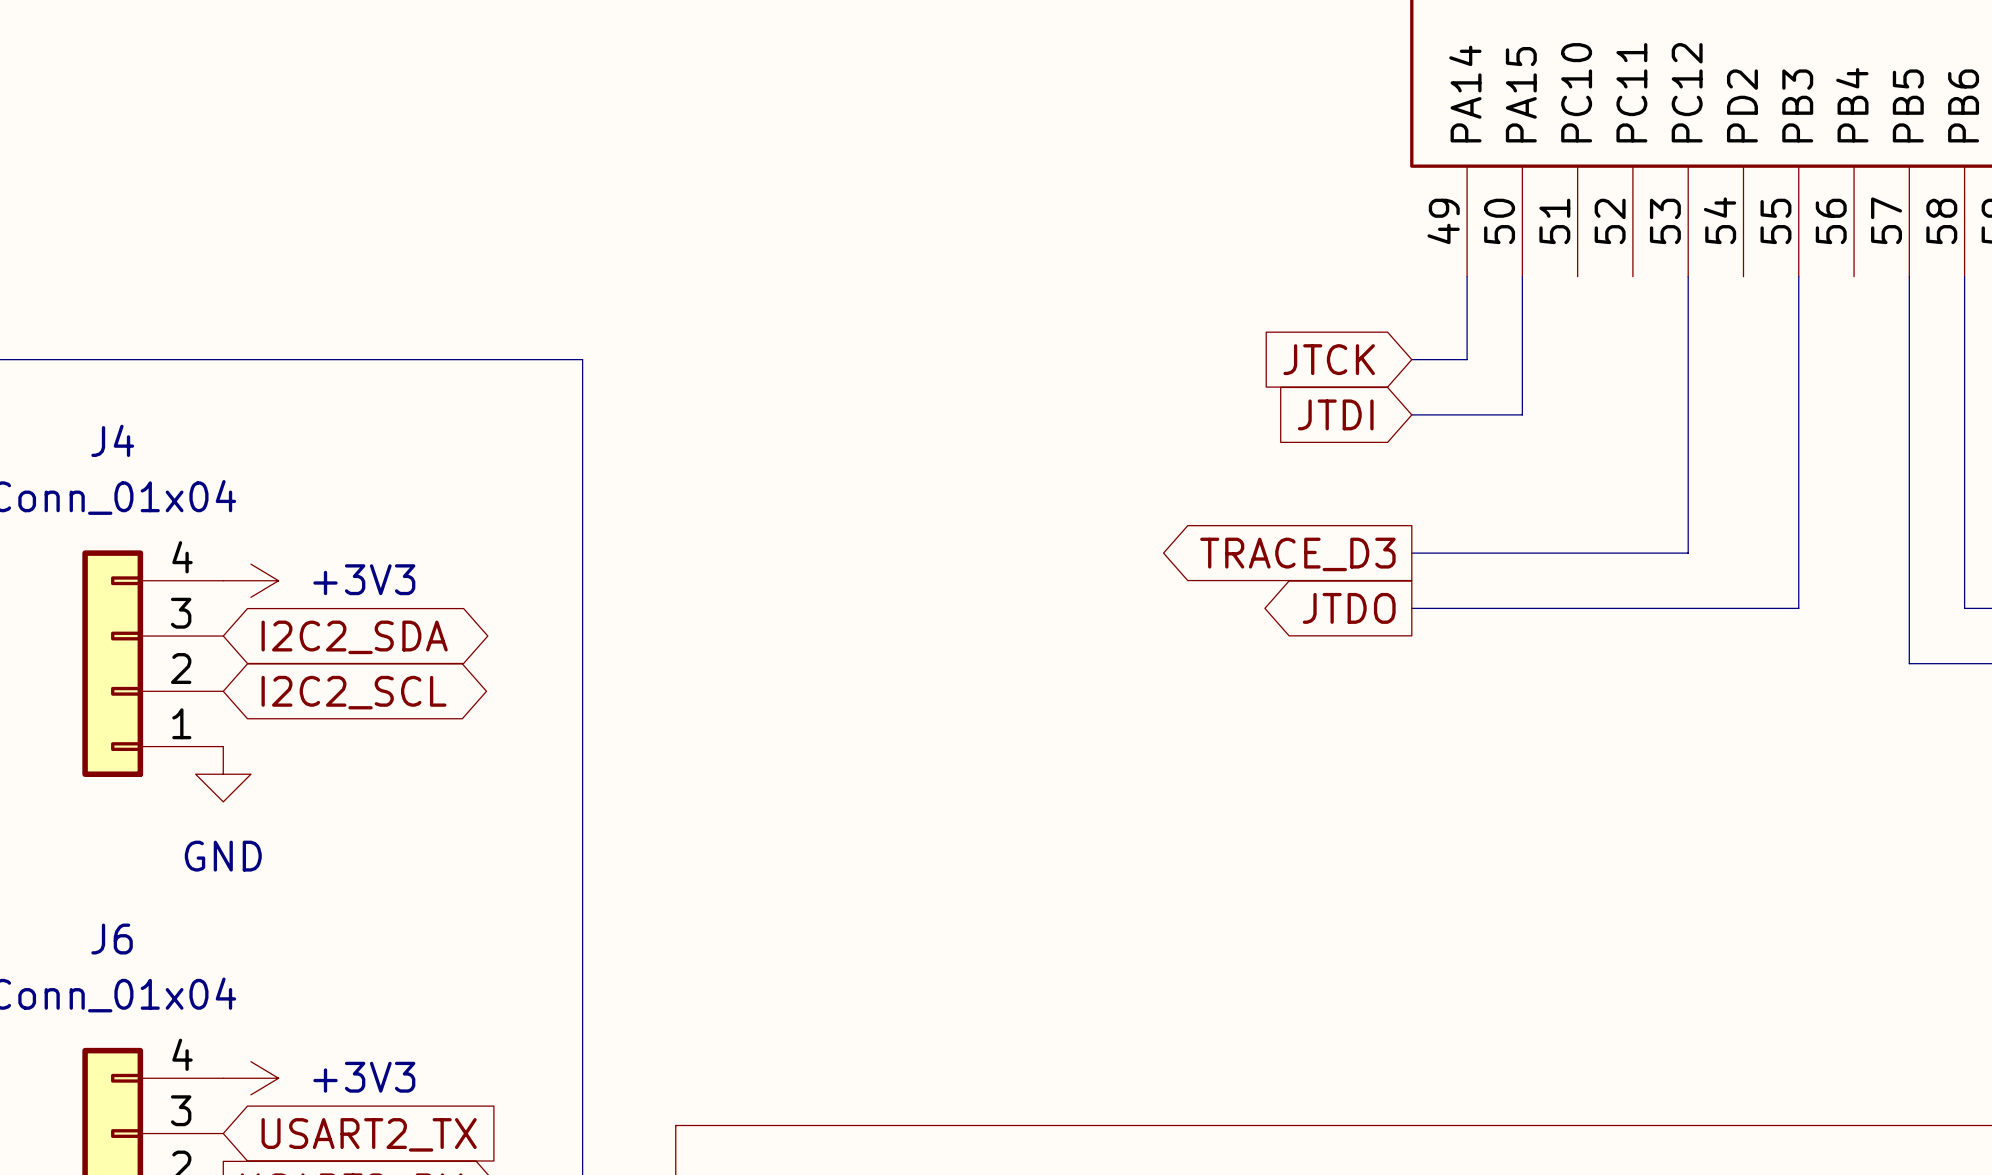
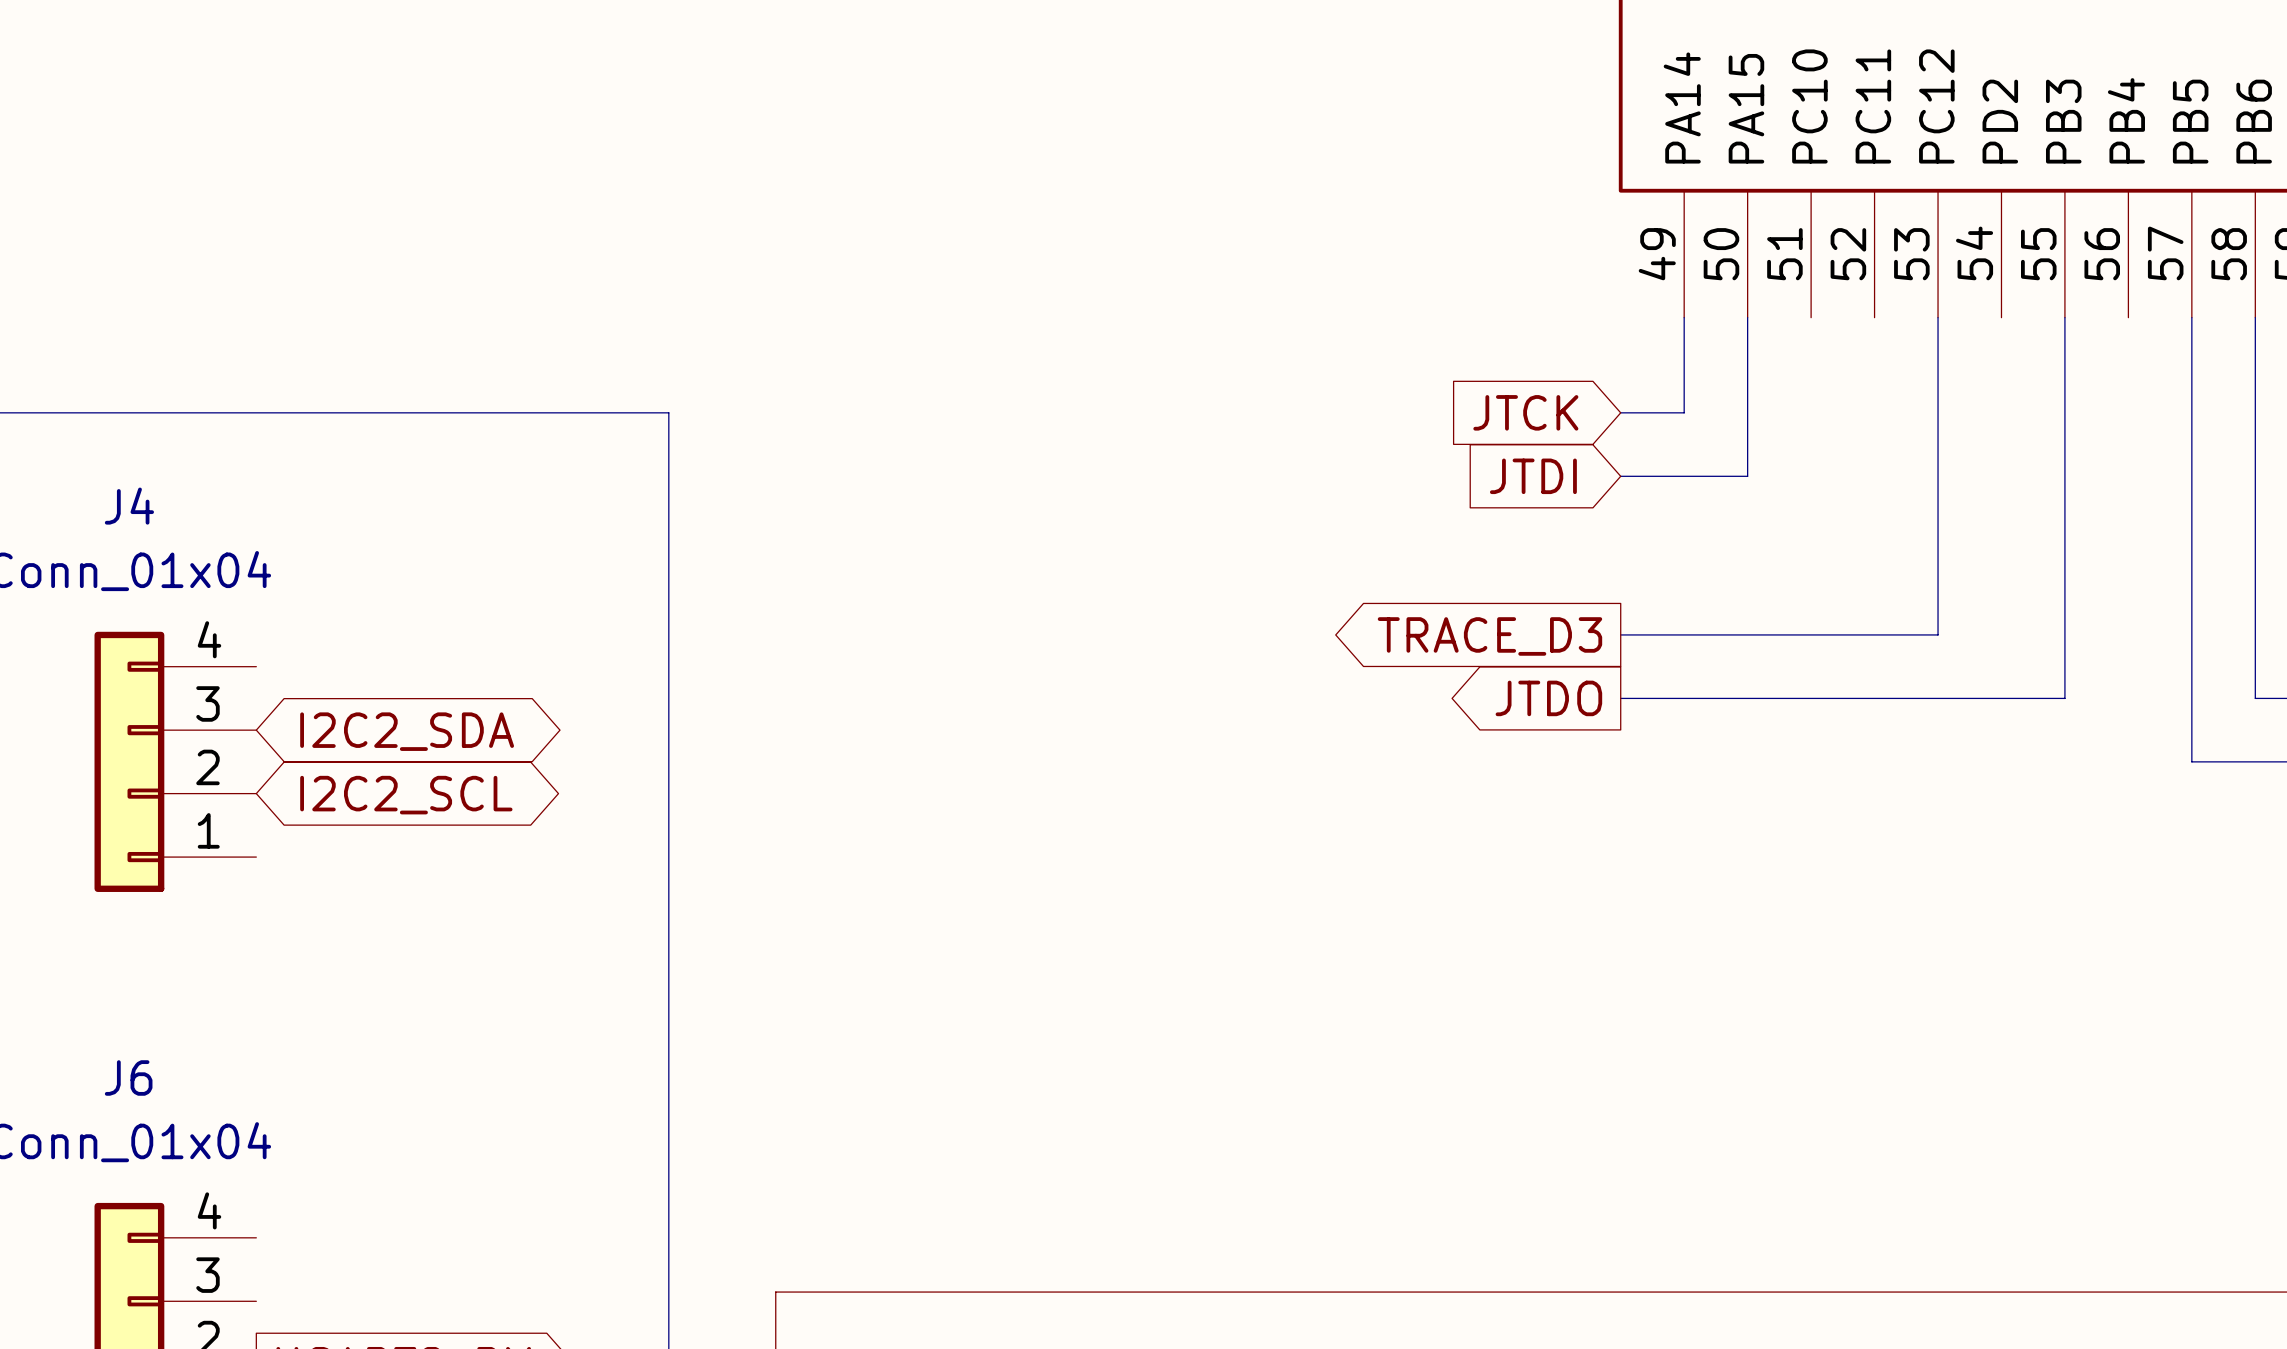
power symbol: +3V3 (250, 580) -> none
power symbol: GND (223, 774) -> none
power symbol: +3V3 (250, 1078) -> none
global label: USART2_TX (369, 1134) -> none

